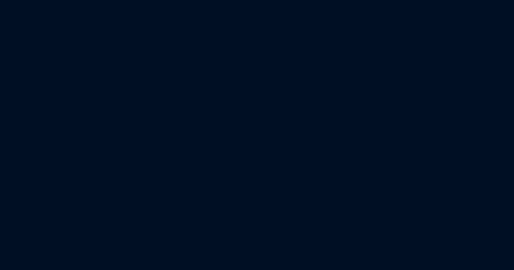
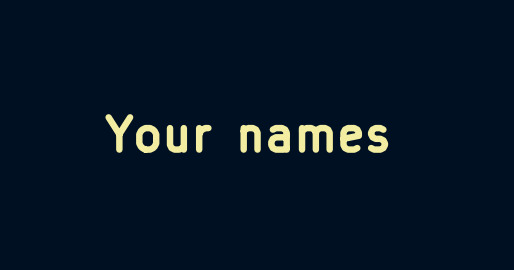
text: none -> Your names (246, 133)

